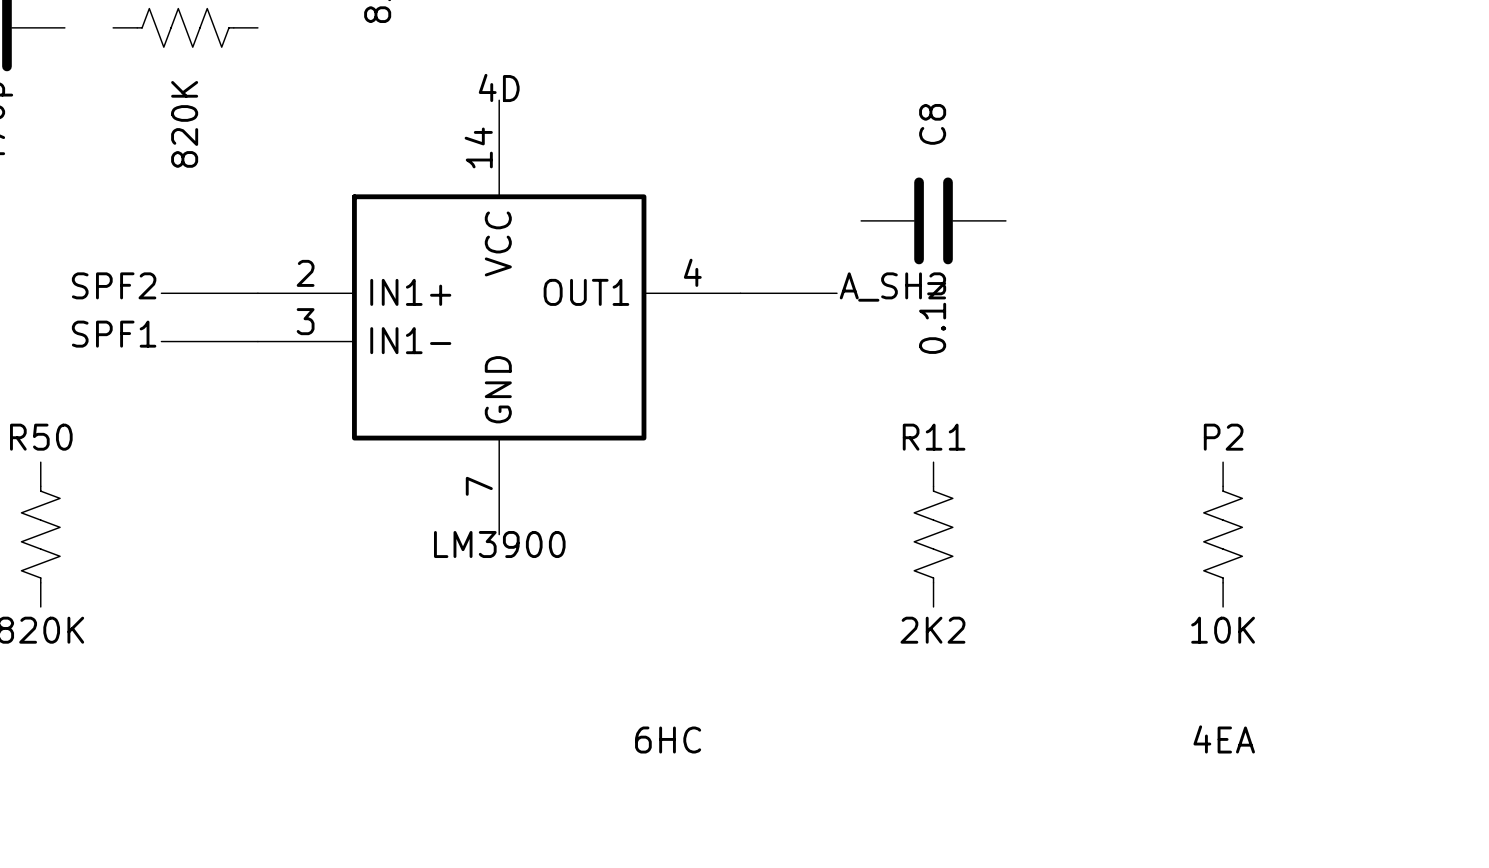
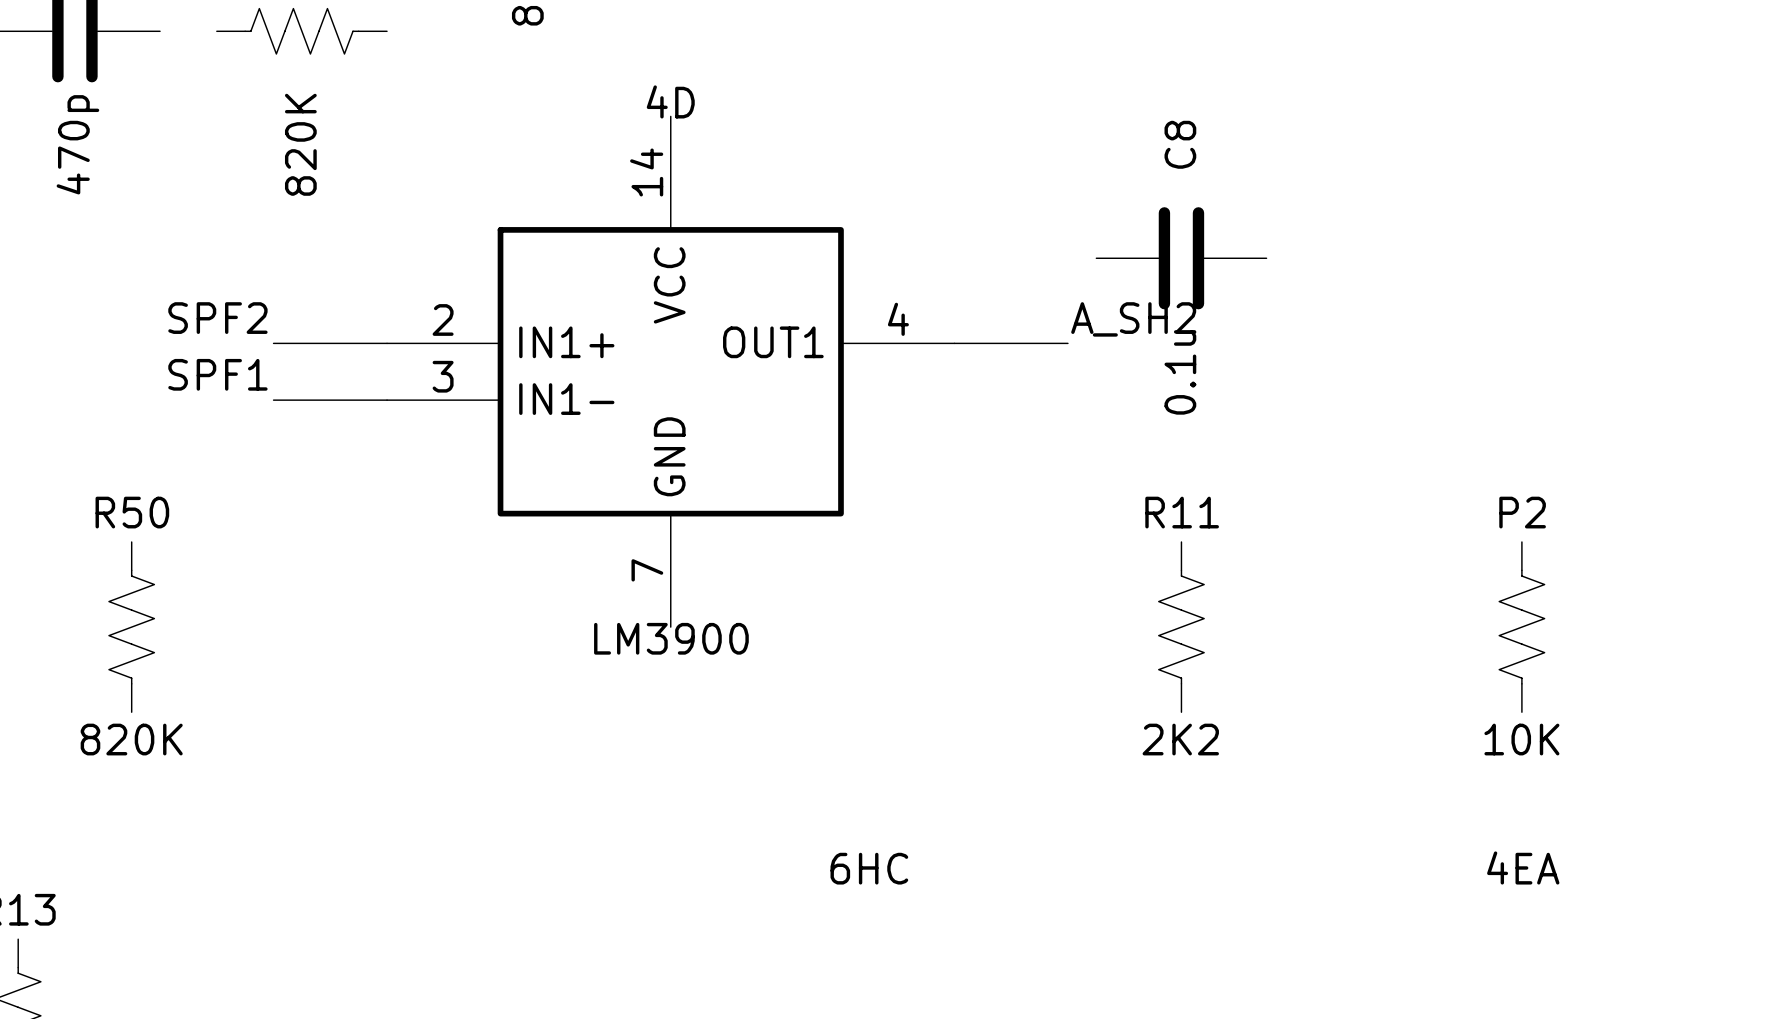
label position: SPF2 (114, 285) -> SPF2 (217, 318)
label position: A_SH2 (892, 287) -> A_SH2 (1133, 319)
label position: SPF1 (114, 334) -> SPF1 (217, 374)

